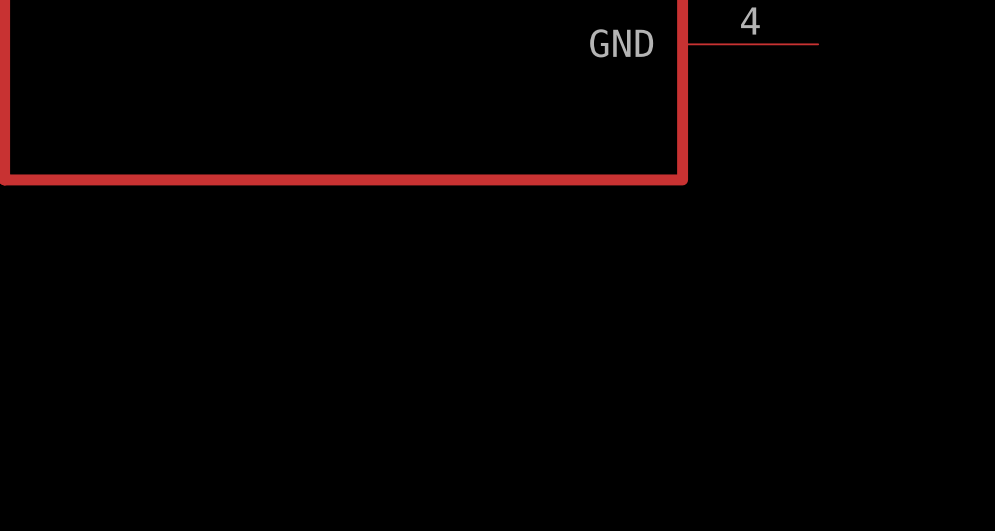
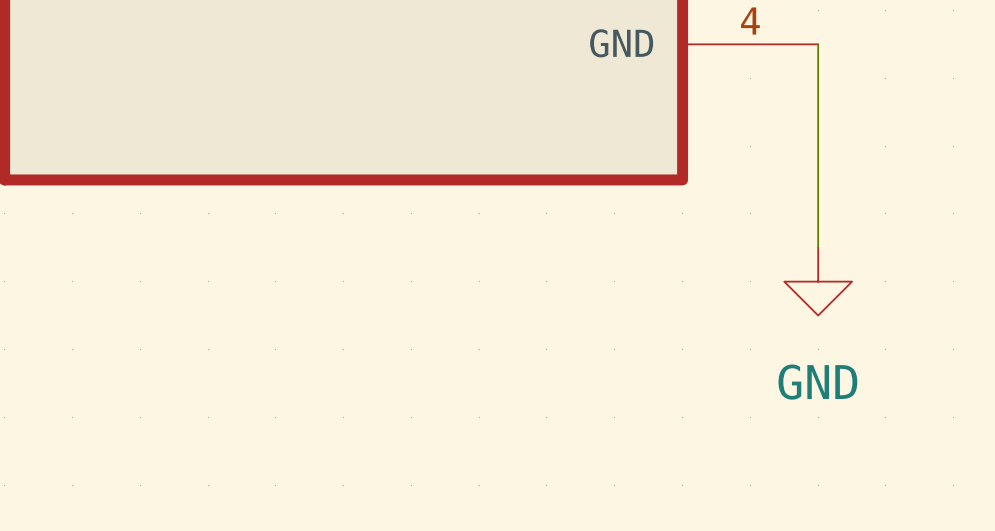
wire: none -> (818, 44) (818, 247)
power symbol: none -> GND (818, 281)

